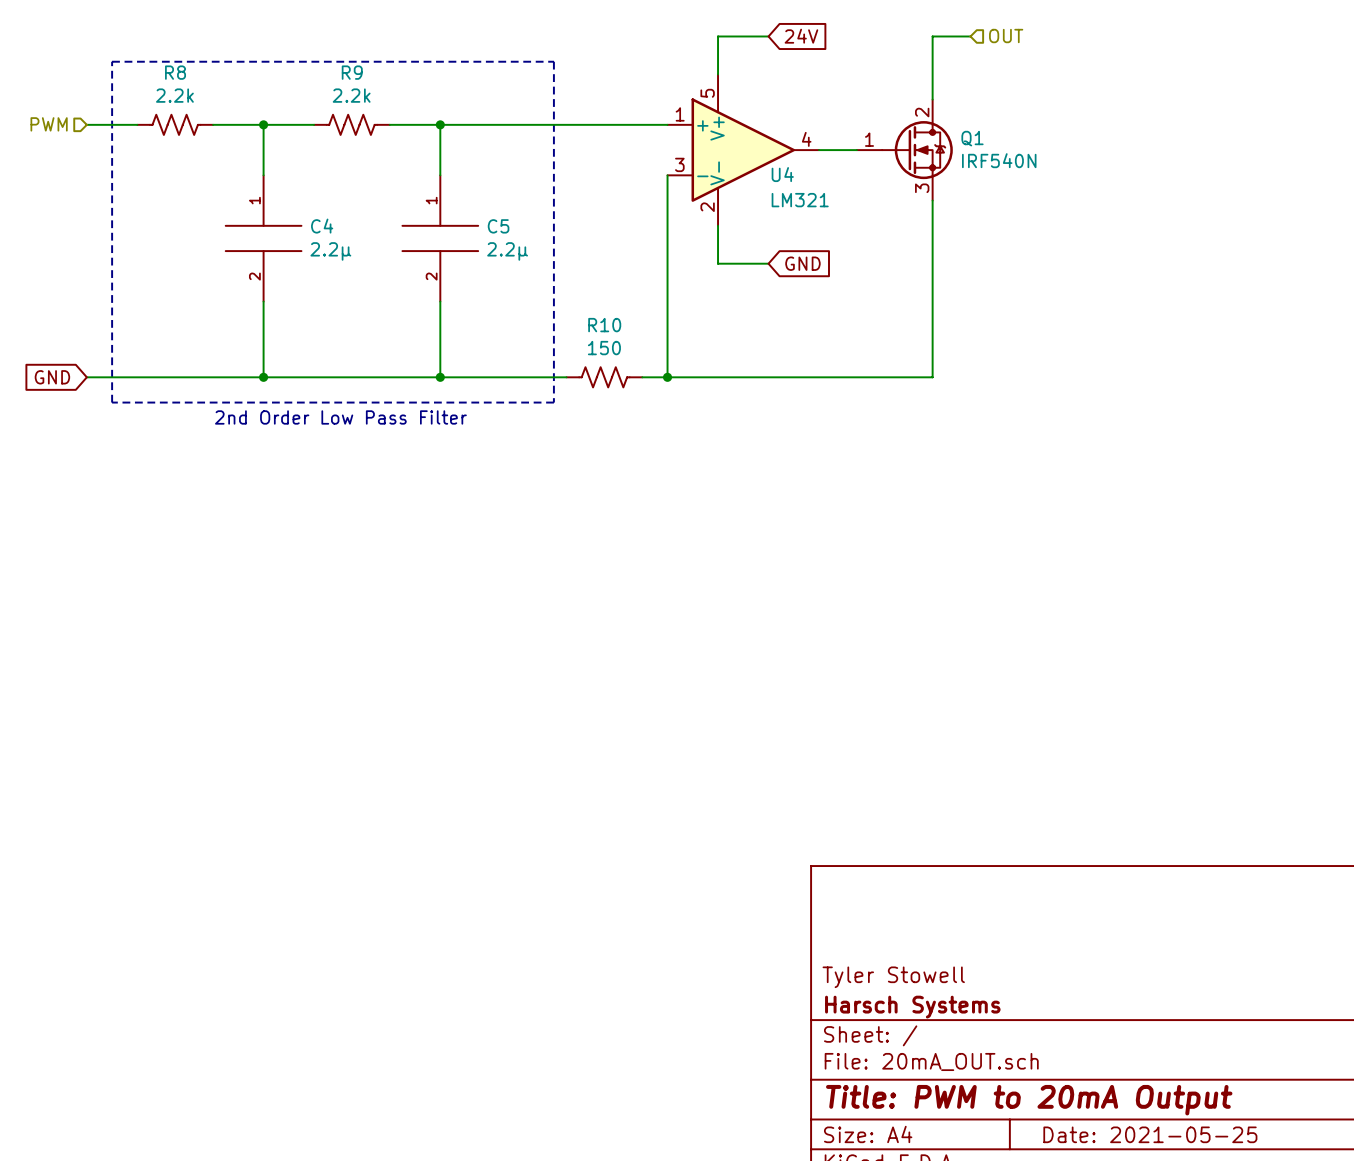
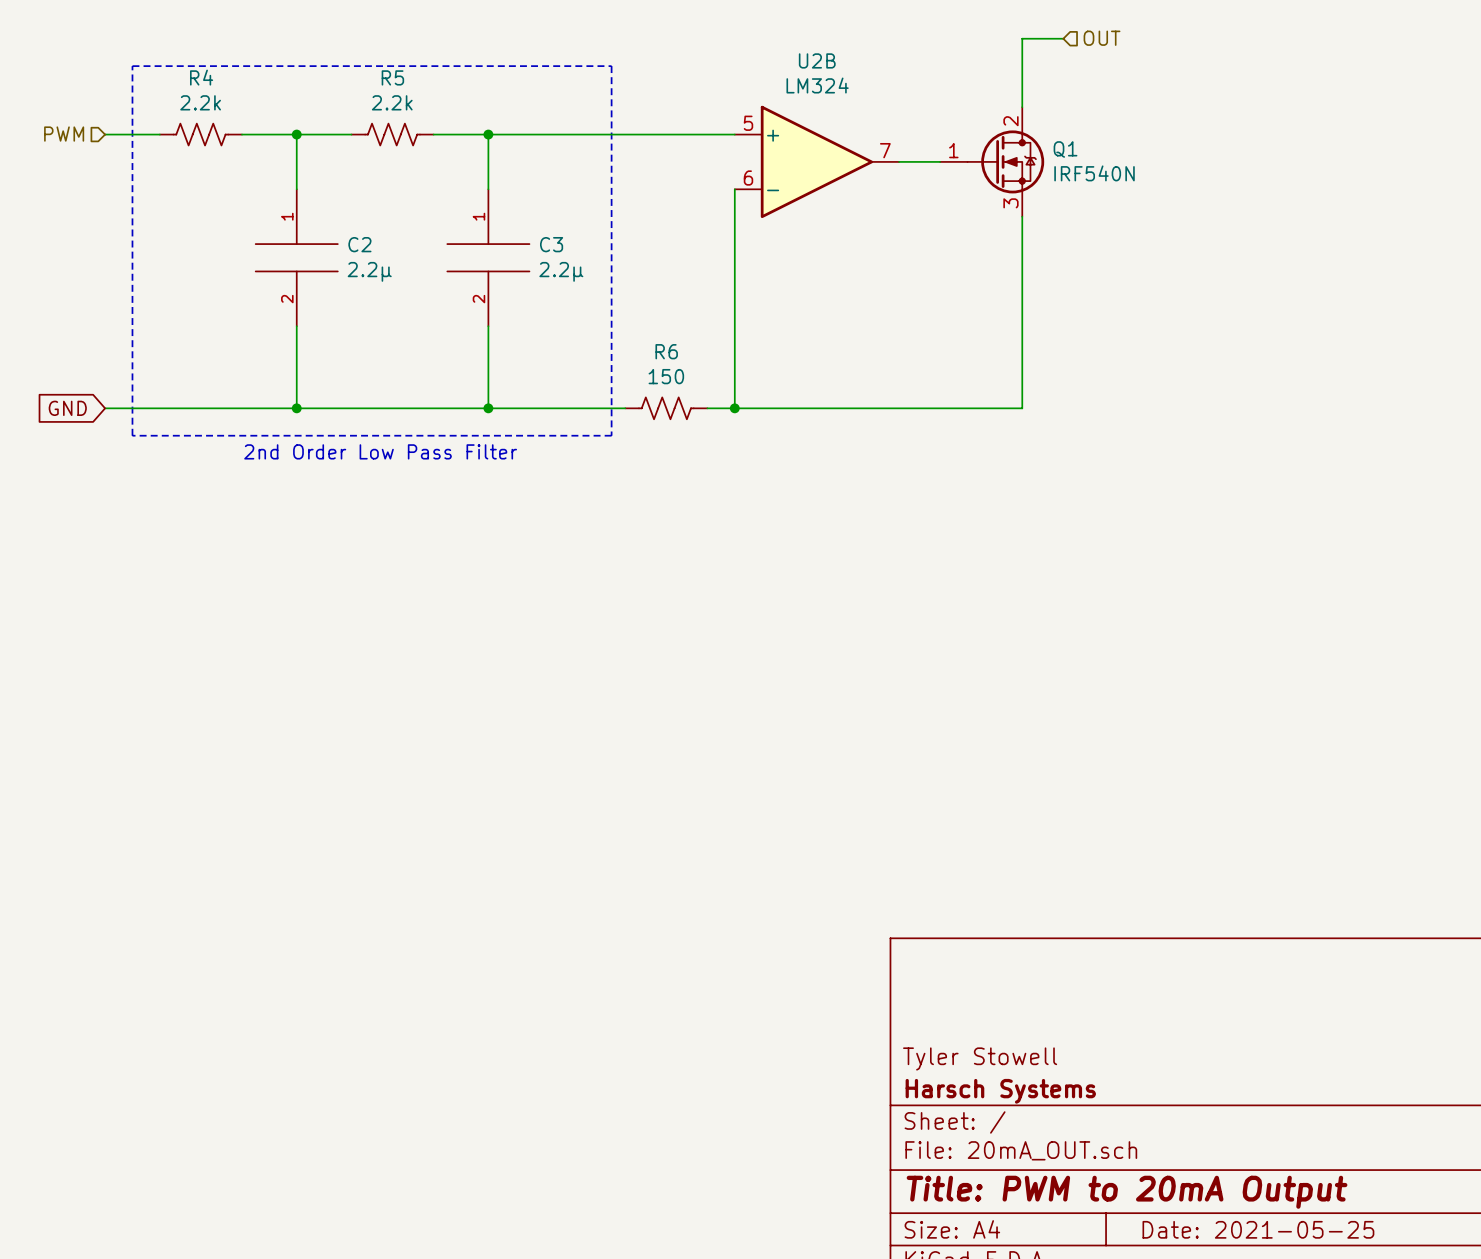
wire: (768, 36) (718, 36) (718, 74) -> none
global label: 24V (801, 36) -> none
R8 name: R8 (175, 72) -> R4 (201, 77)
R9 name: R9 (352, 72) -> R5 (392, 77)
U4: LM321 (743, 150) -> none
U2B: none -> LM324 (816, 161)
wire: (718, 225) (718, 263) (768, 263) -> none
C4 name: C4 (322, 226) -> C2 (359, 244)
C5 name: C5 (498, 226) -> C3 (551, 244)
global label: GND (802, 263) -> none
R10 name: R10 (604, 325) -> R6 (666, 351)

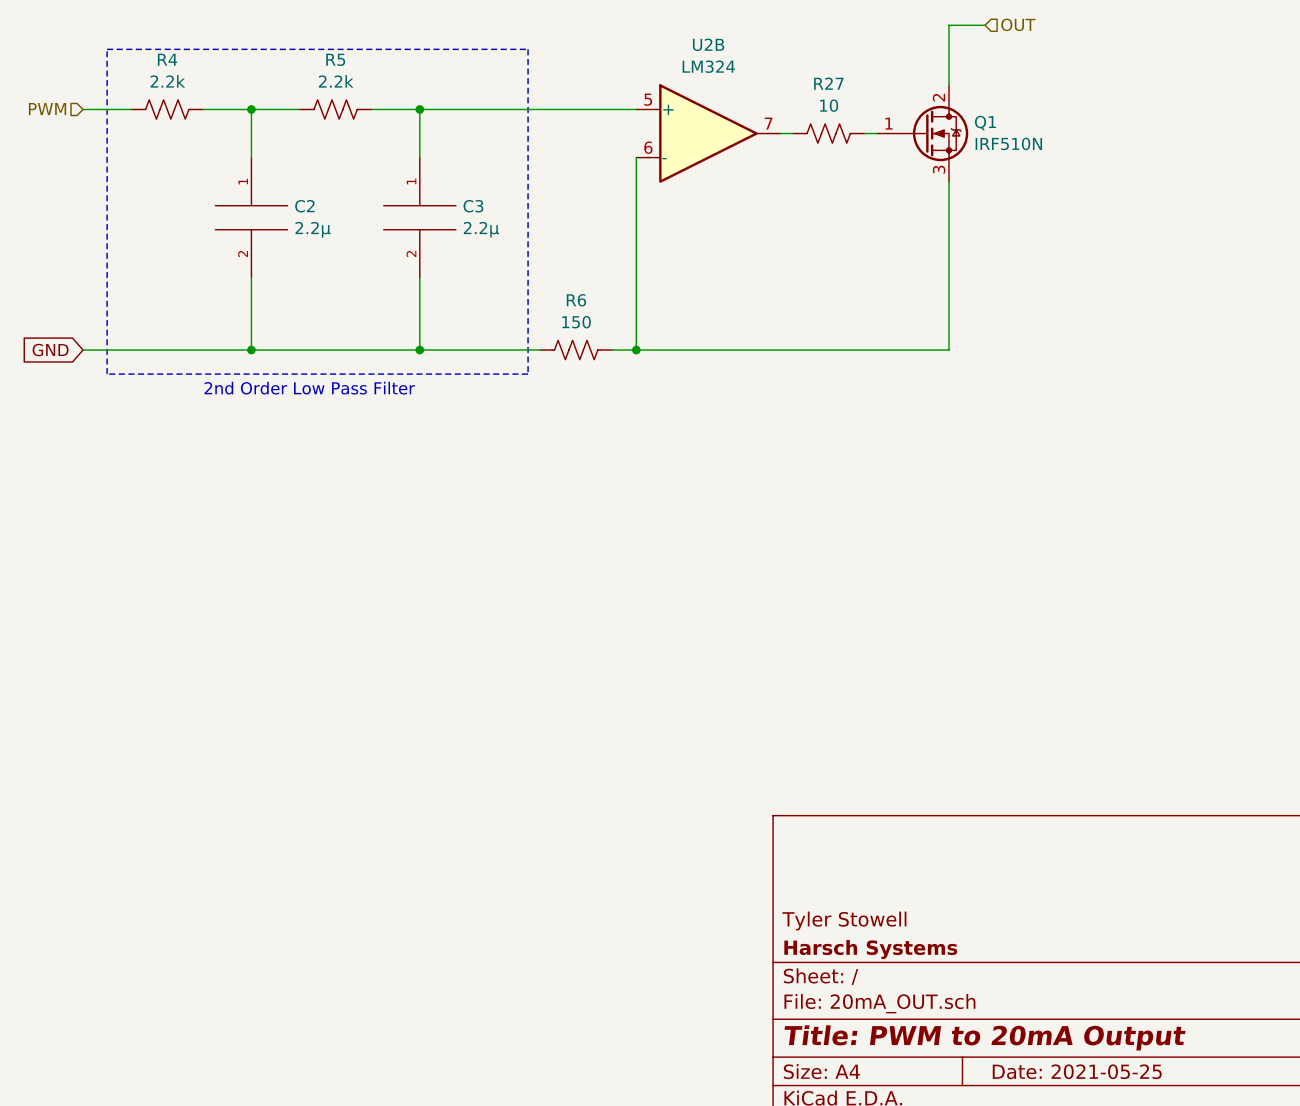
wire: (1063, 38) (1022, 38) (1022, 107) -> (985, 25) (948, 25) (948, 85)
hierarchical label position: OUT (1102, 38) -> OUT (1018, 24)
R27: none -> 10 (828, 133)
Q1 position: (992, 161) -> (922, 133)
Q1 value: IRF540N (1094, 173) -> IRF510N (1008, 143)
wire: (1022, 216) (1022, 408) -> (948, 181) (948, 350) (888, 350)

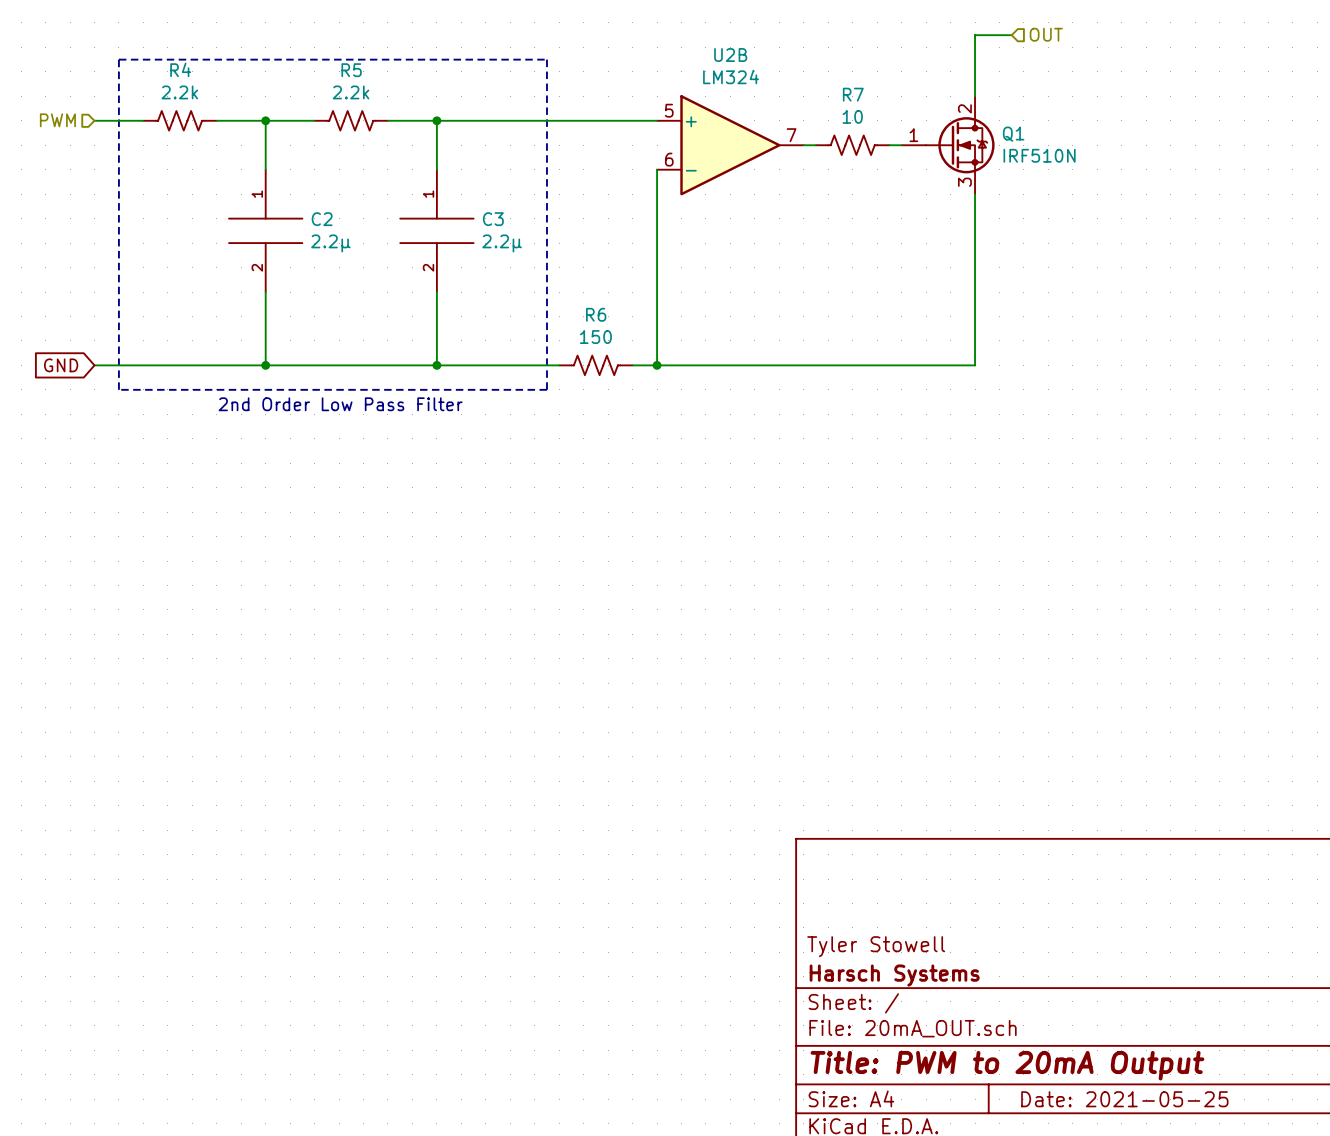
R27 name: R27 (828, 83) -> R7 (853, 94)

